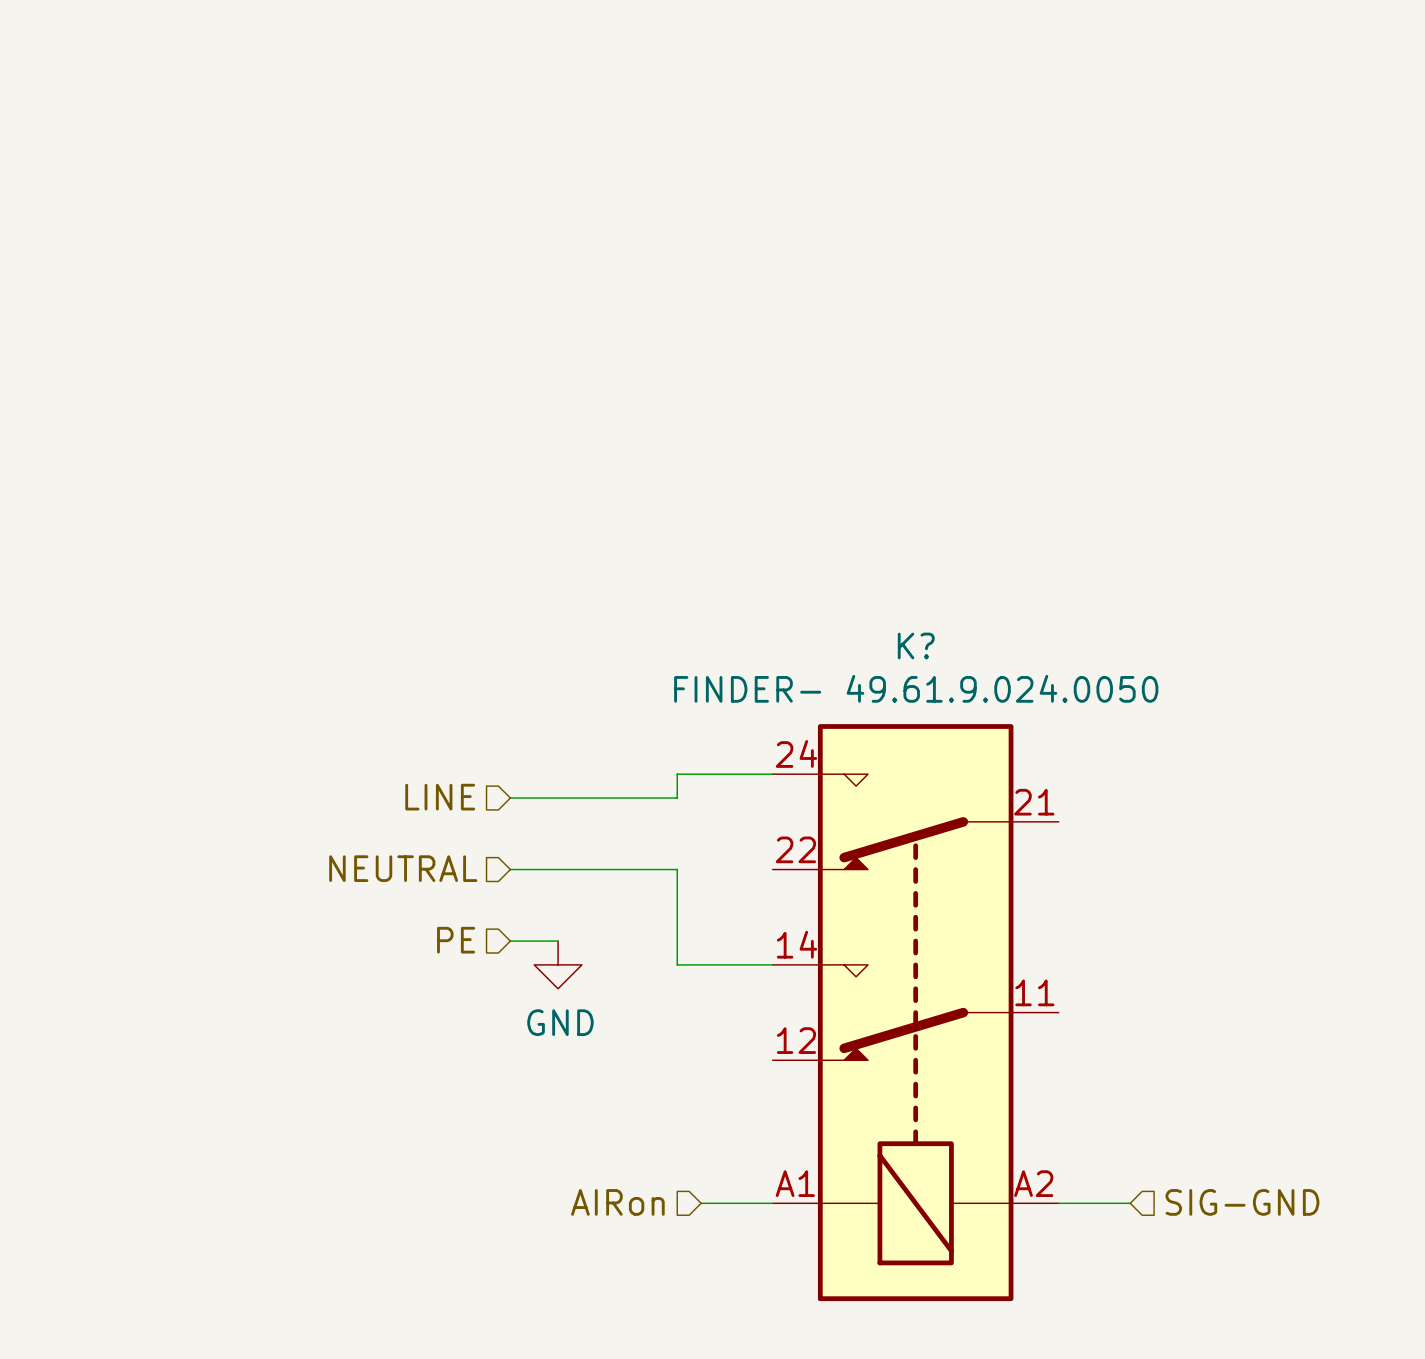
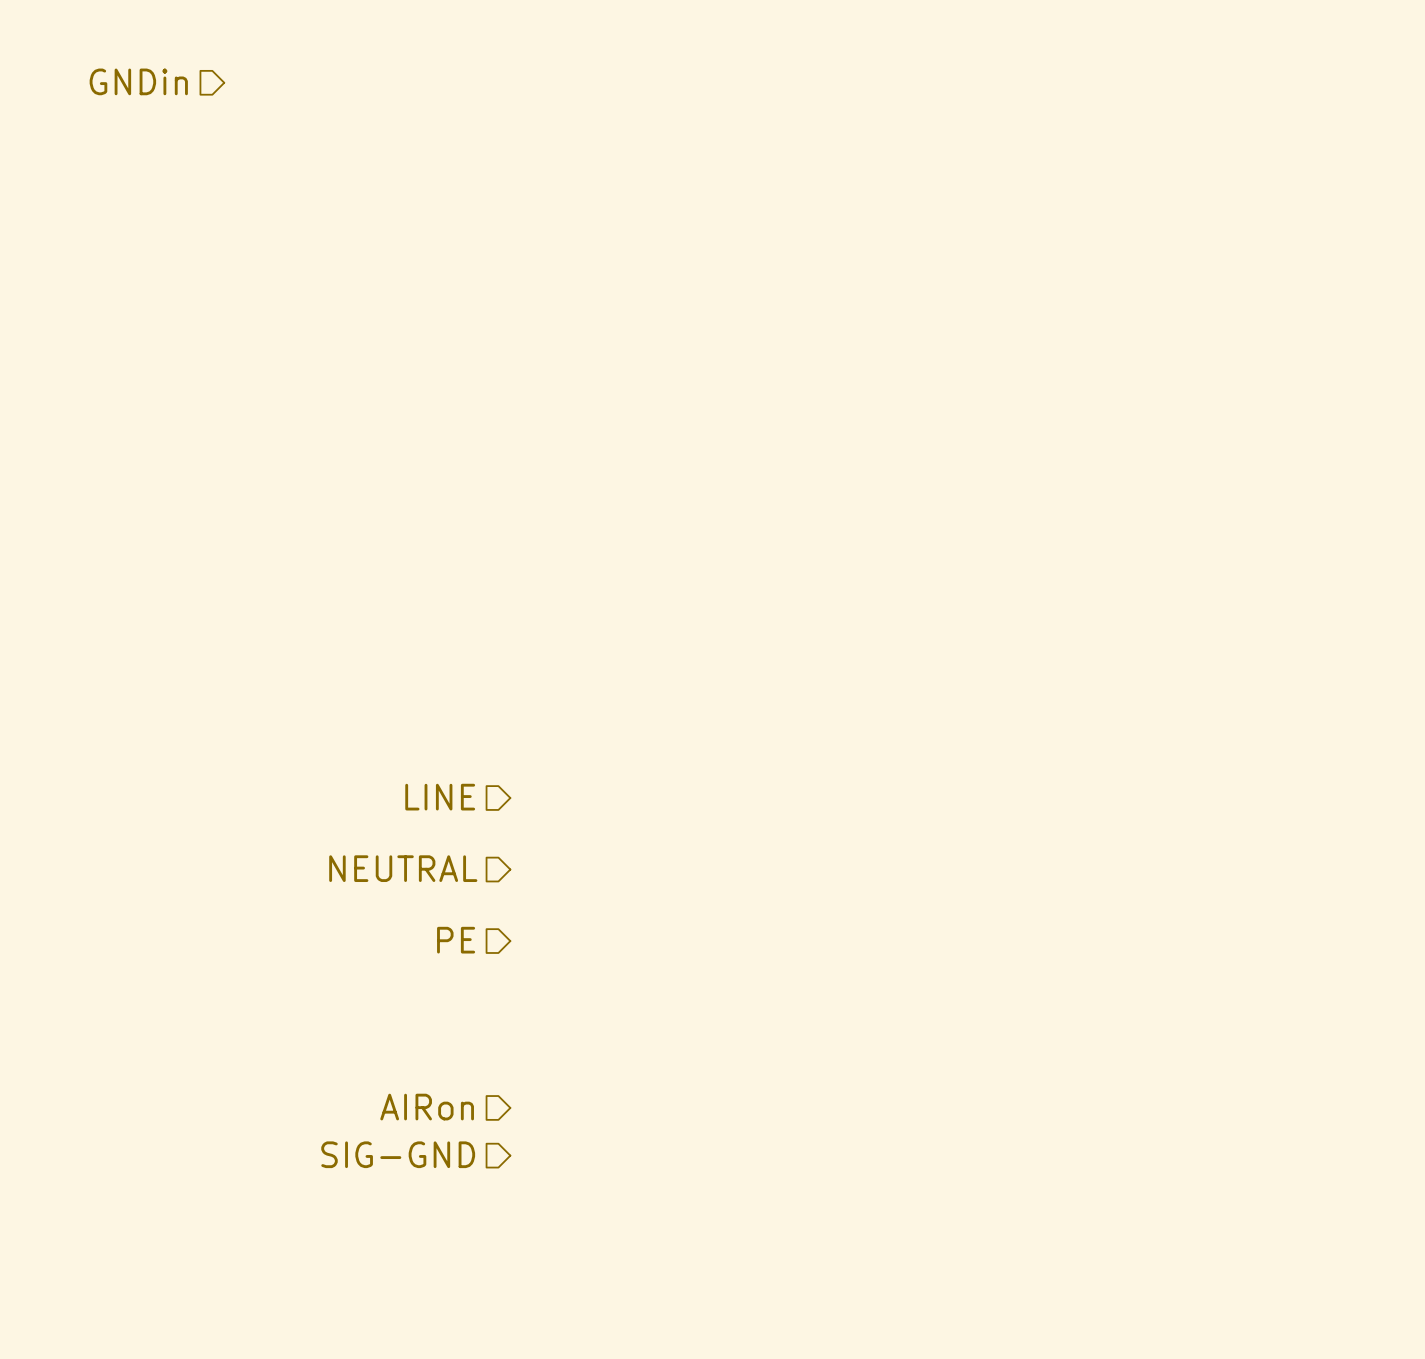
hierarchical label: none -> GNDin (138, 81)
wire: (772, 774) (677, 774) (677, 798) (510, 798) -> none
wire: (510, 869) (677, 869) (677, 964) (772, 964) -> none
wire: (510, 941) (558, 941) -> none
power symbol: GND (558, 964) -> none
K?: FINDER- 49.61.9.024.0050 (915, 1012) -> none
hierarchical label: none -> SIG-GND (398, 1154)
hierarchical label position: AIRon (617, 1202) -> AIRon (427, 1107)
hierarchical label: SIG-GND (1242, 1202) -> none
wire: (701, 1203) (772, 1203) -> none
wire: (1058, 1203) (1130, 1203) -> none

